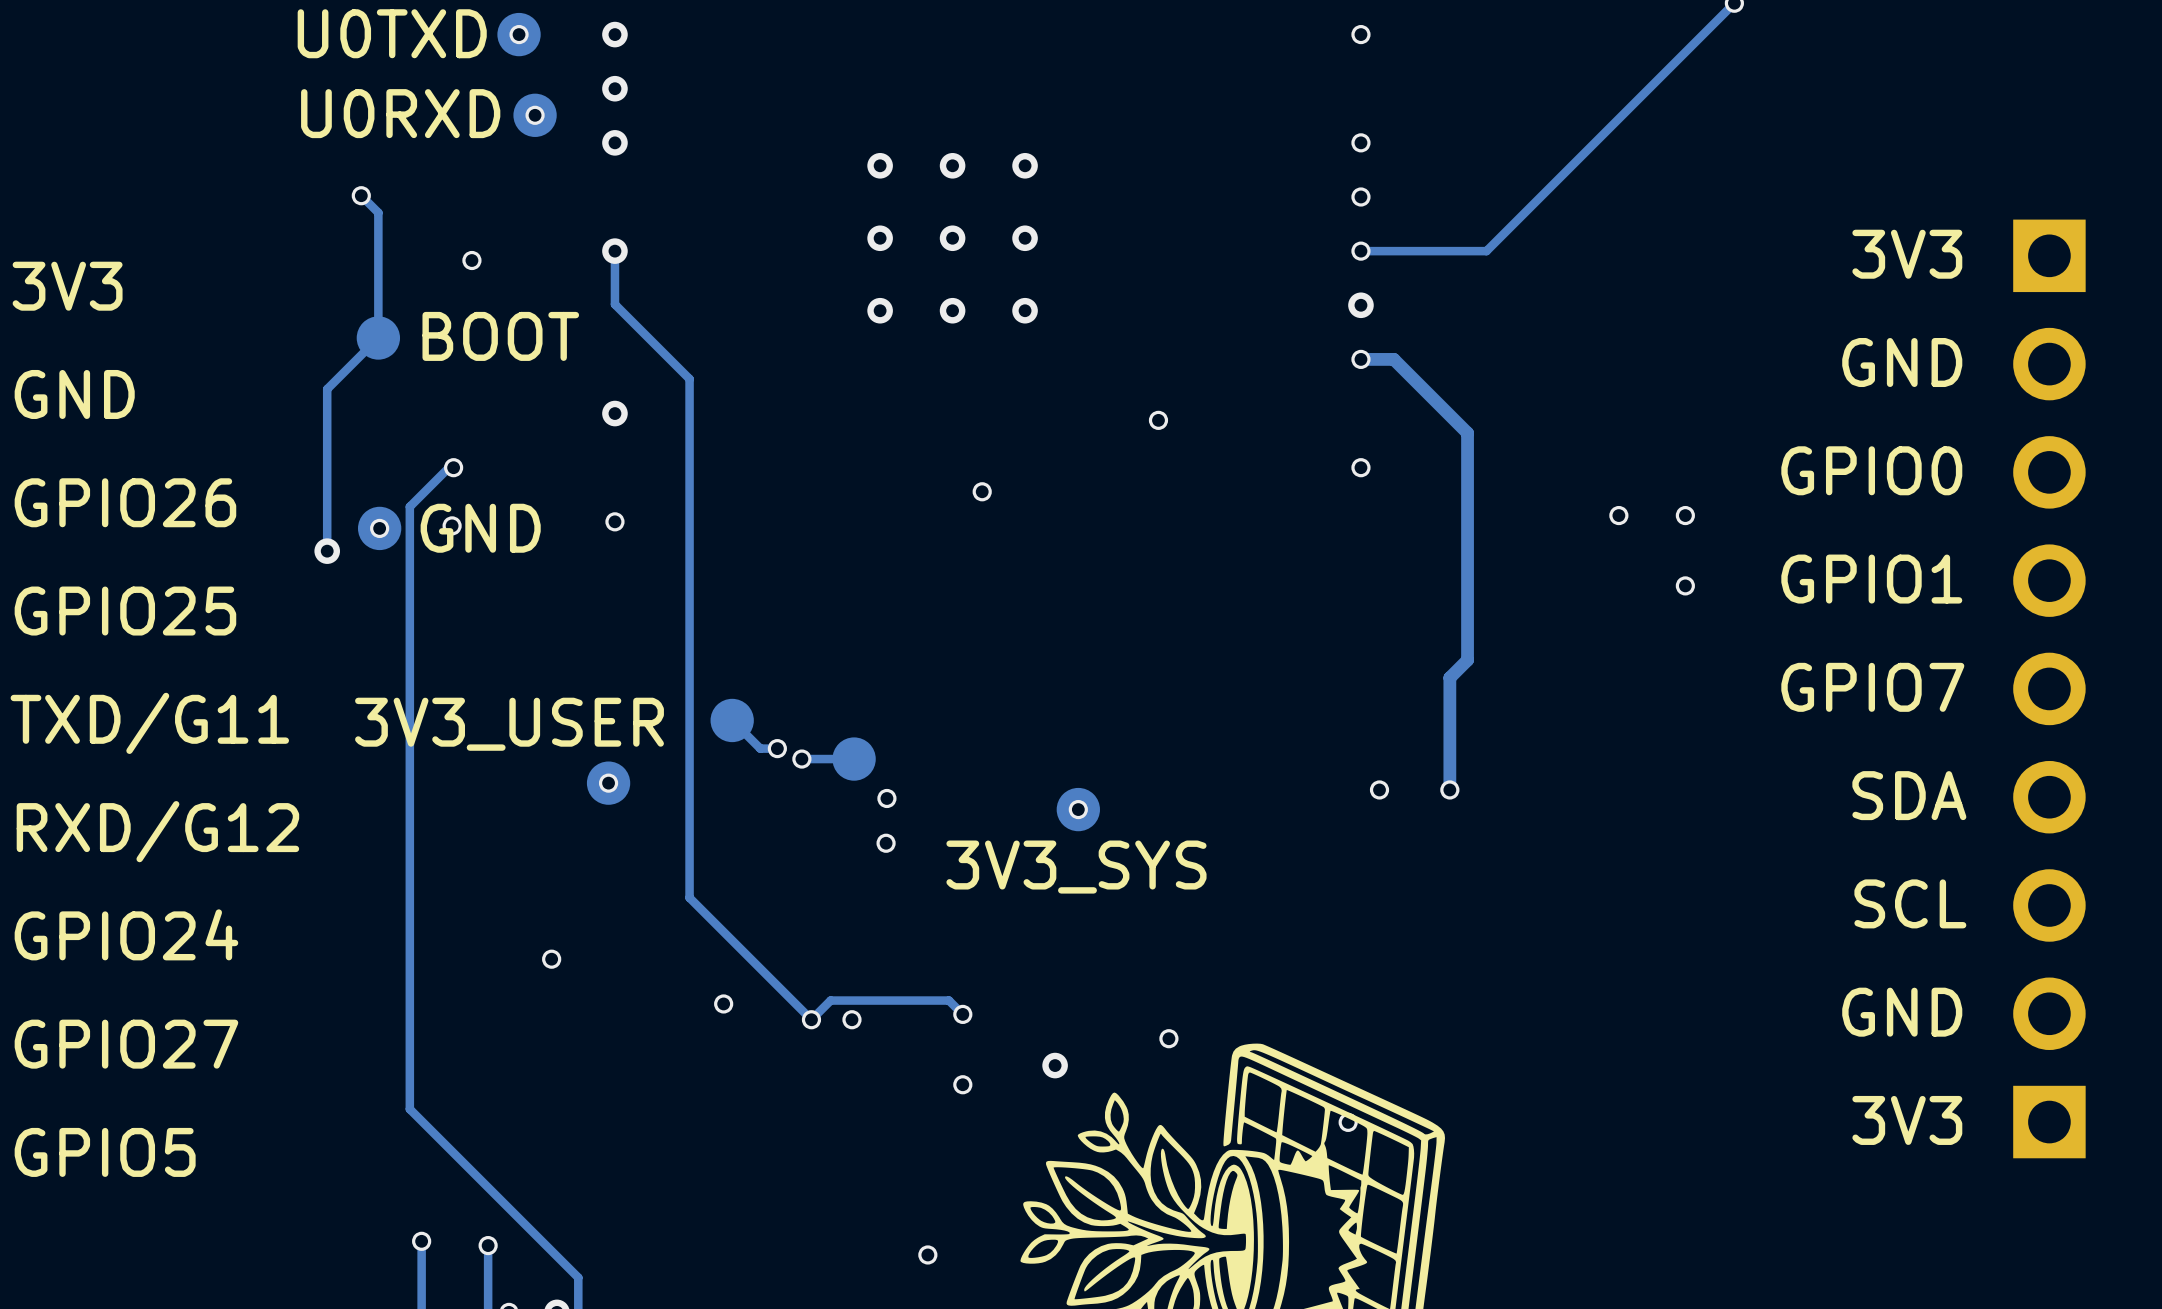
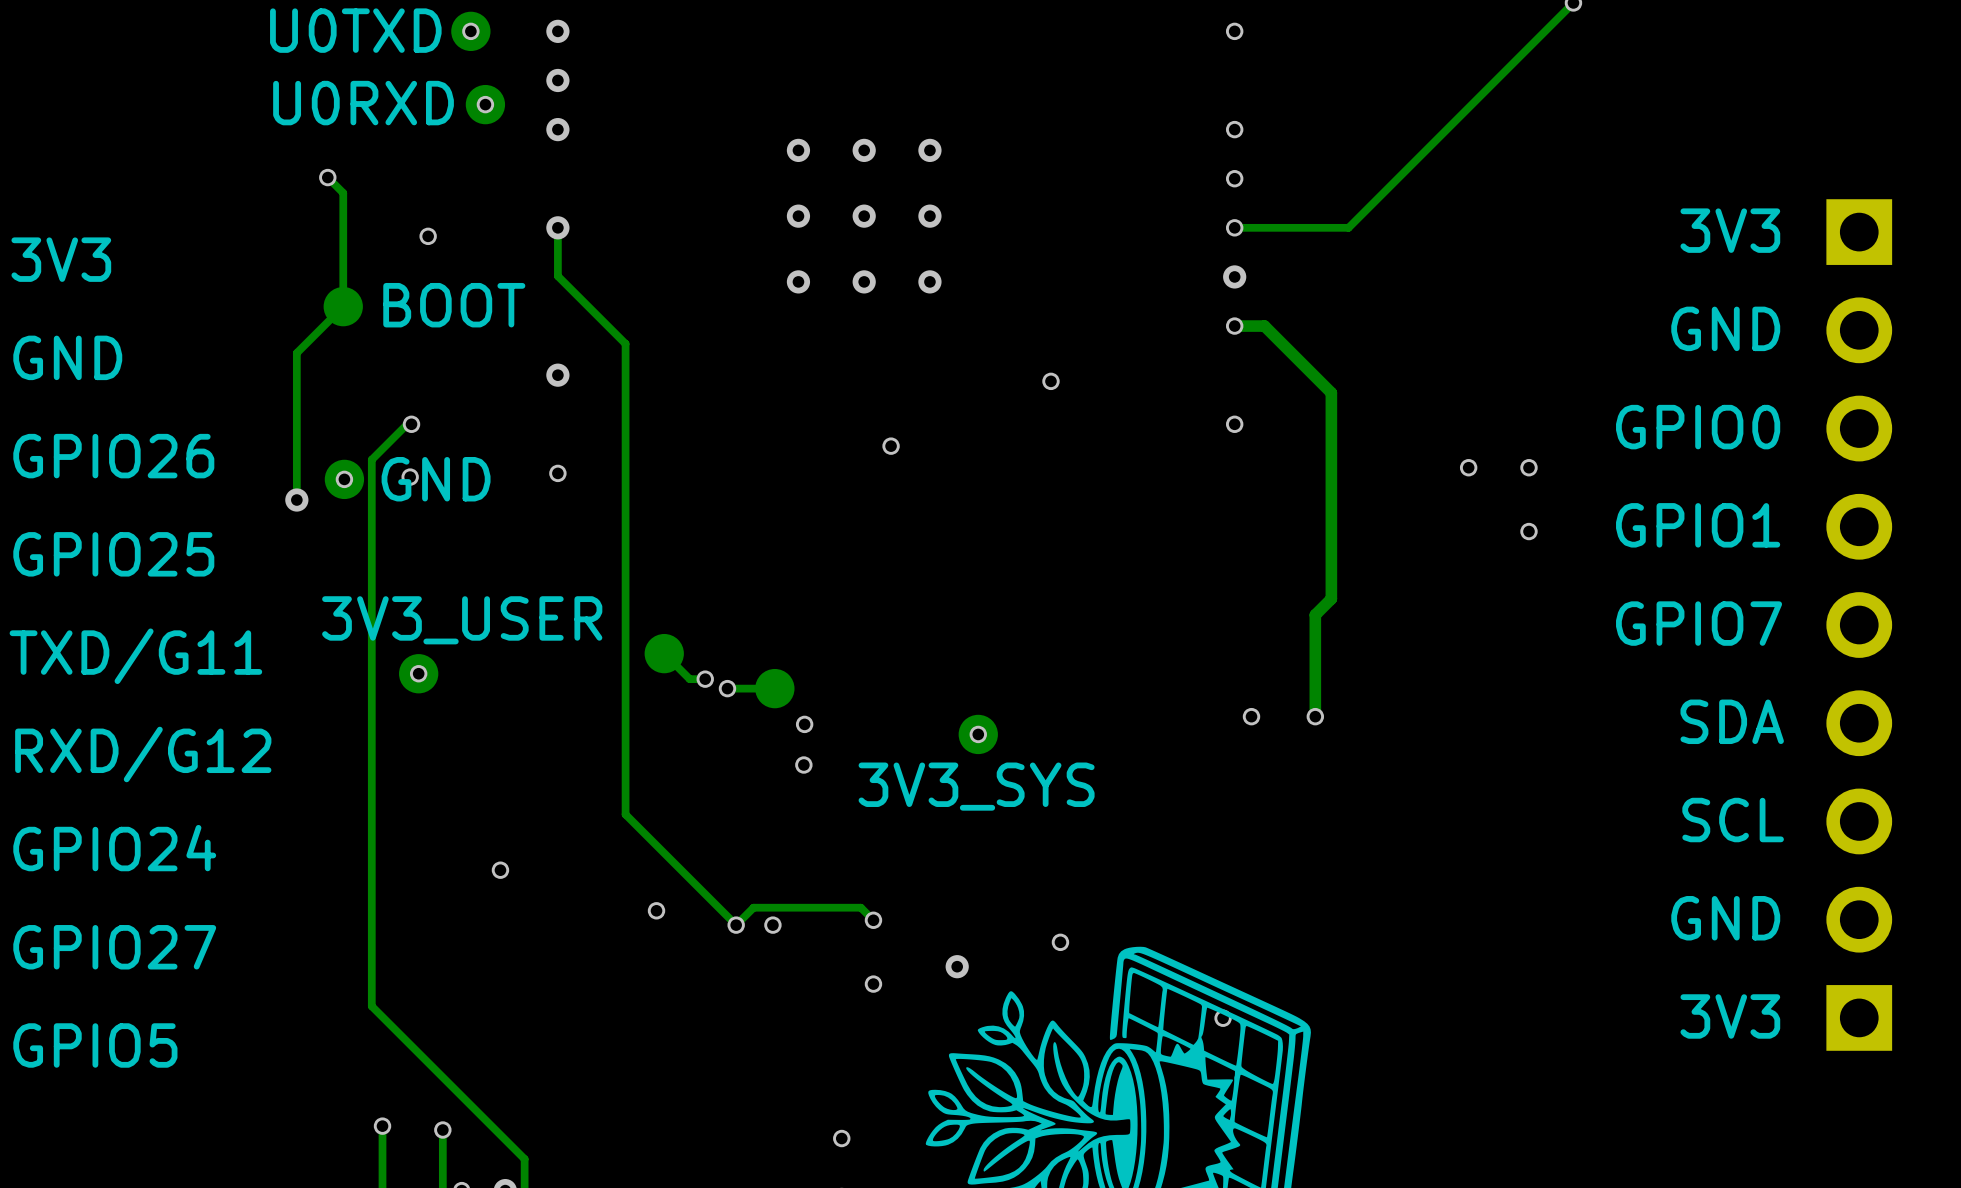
part value position: 3V3_USER (509, 724) -> 3V3_USER (462, 620)
part position: (608, 783) -> (418, 673)
via position: (608, 783) -> (418, 673)

